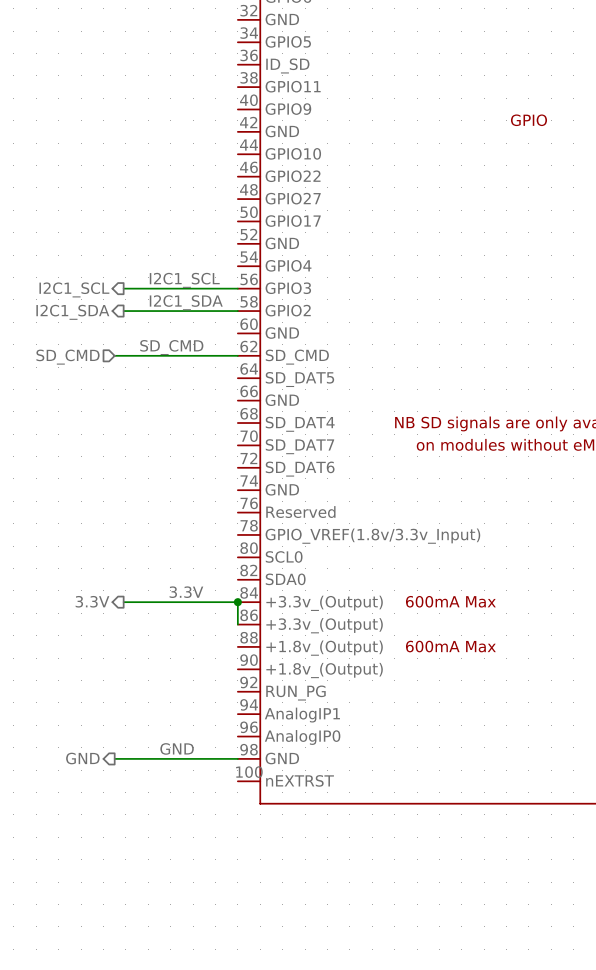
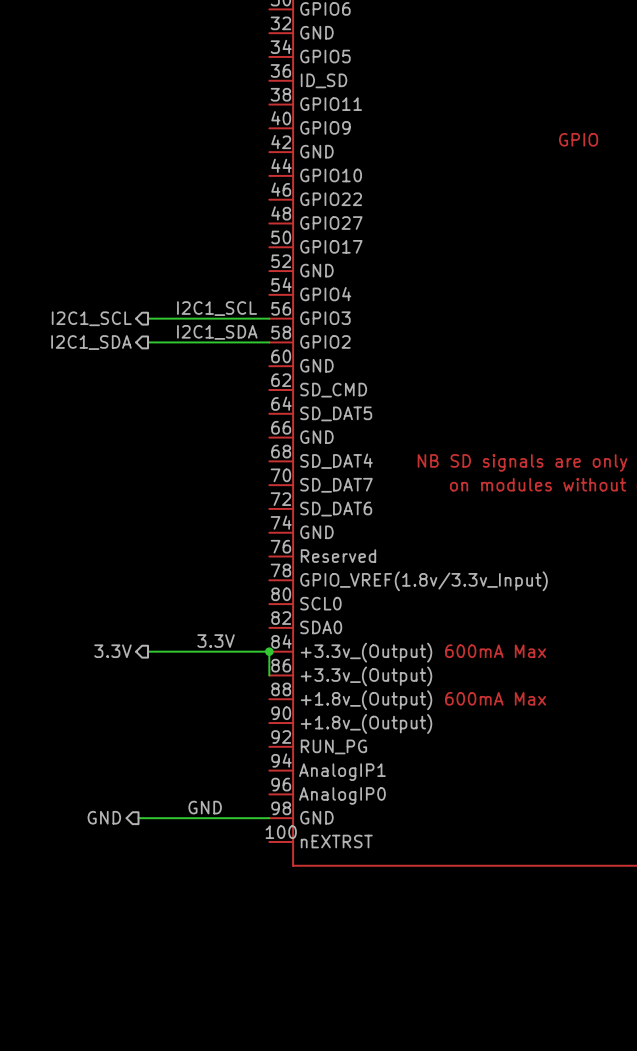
label: SD_CMD (171, 347) -> none
wire: (114, 355) (237, 355) -> none
hierarchical label: SD_CMD (68, 357) -> none

